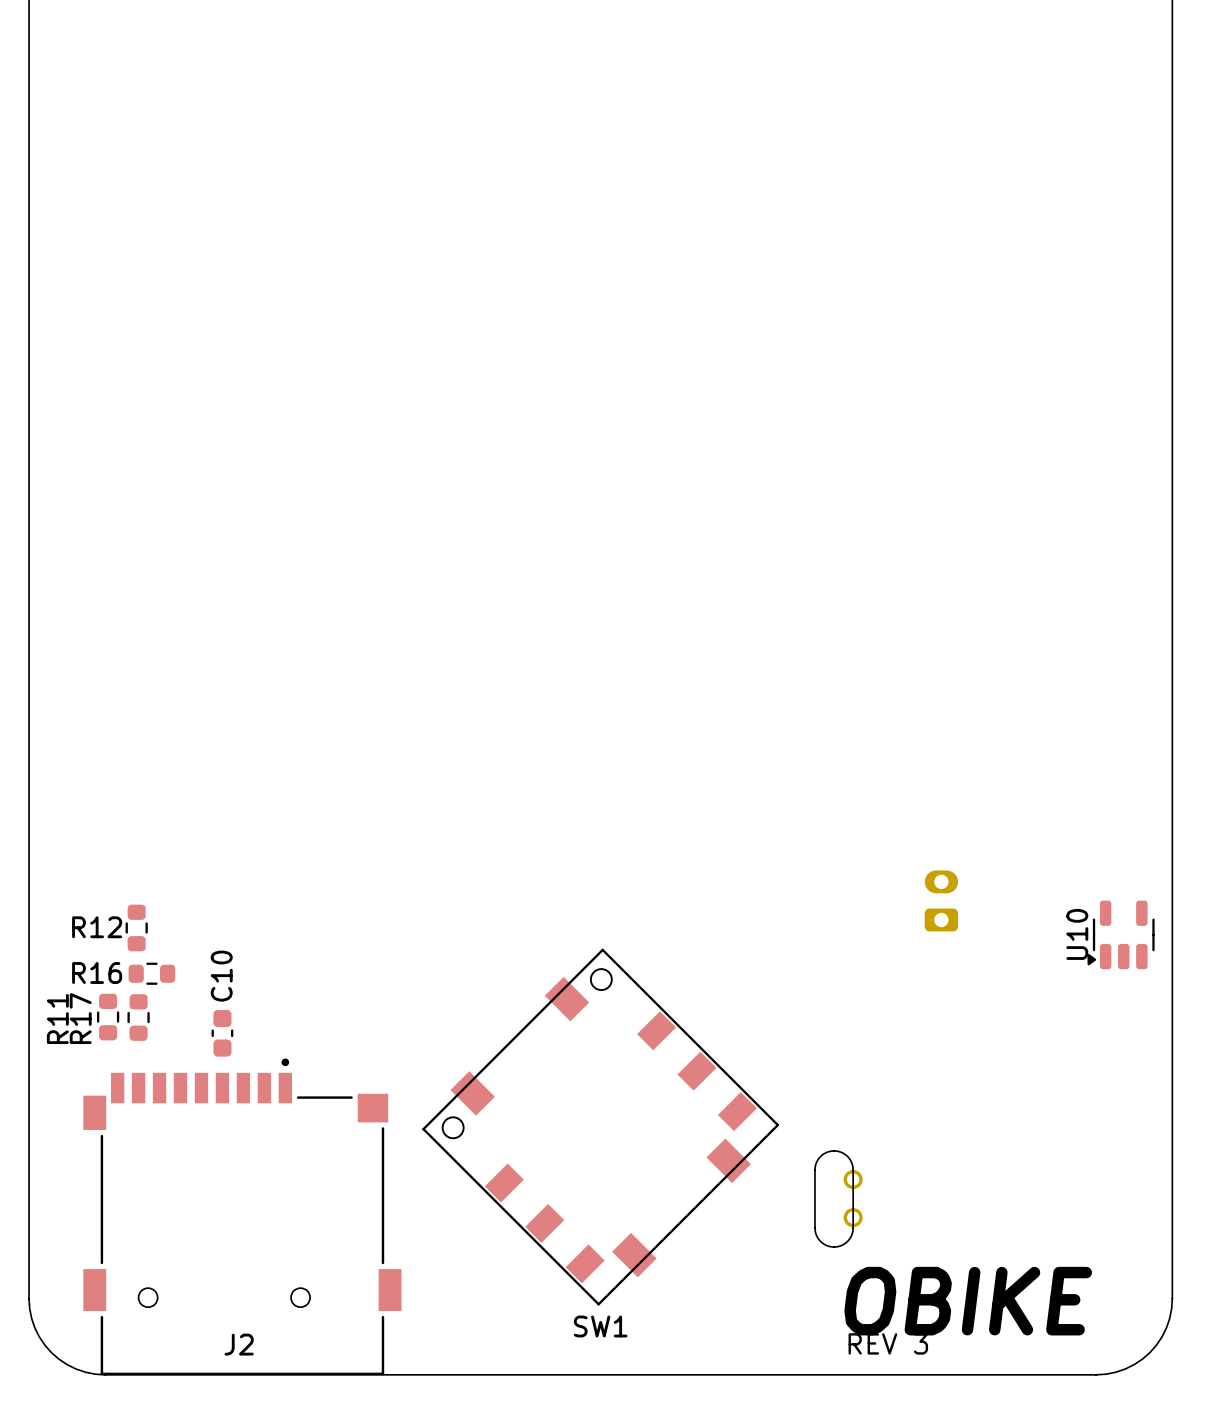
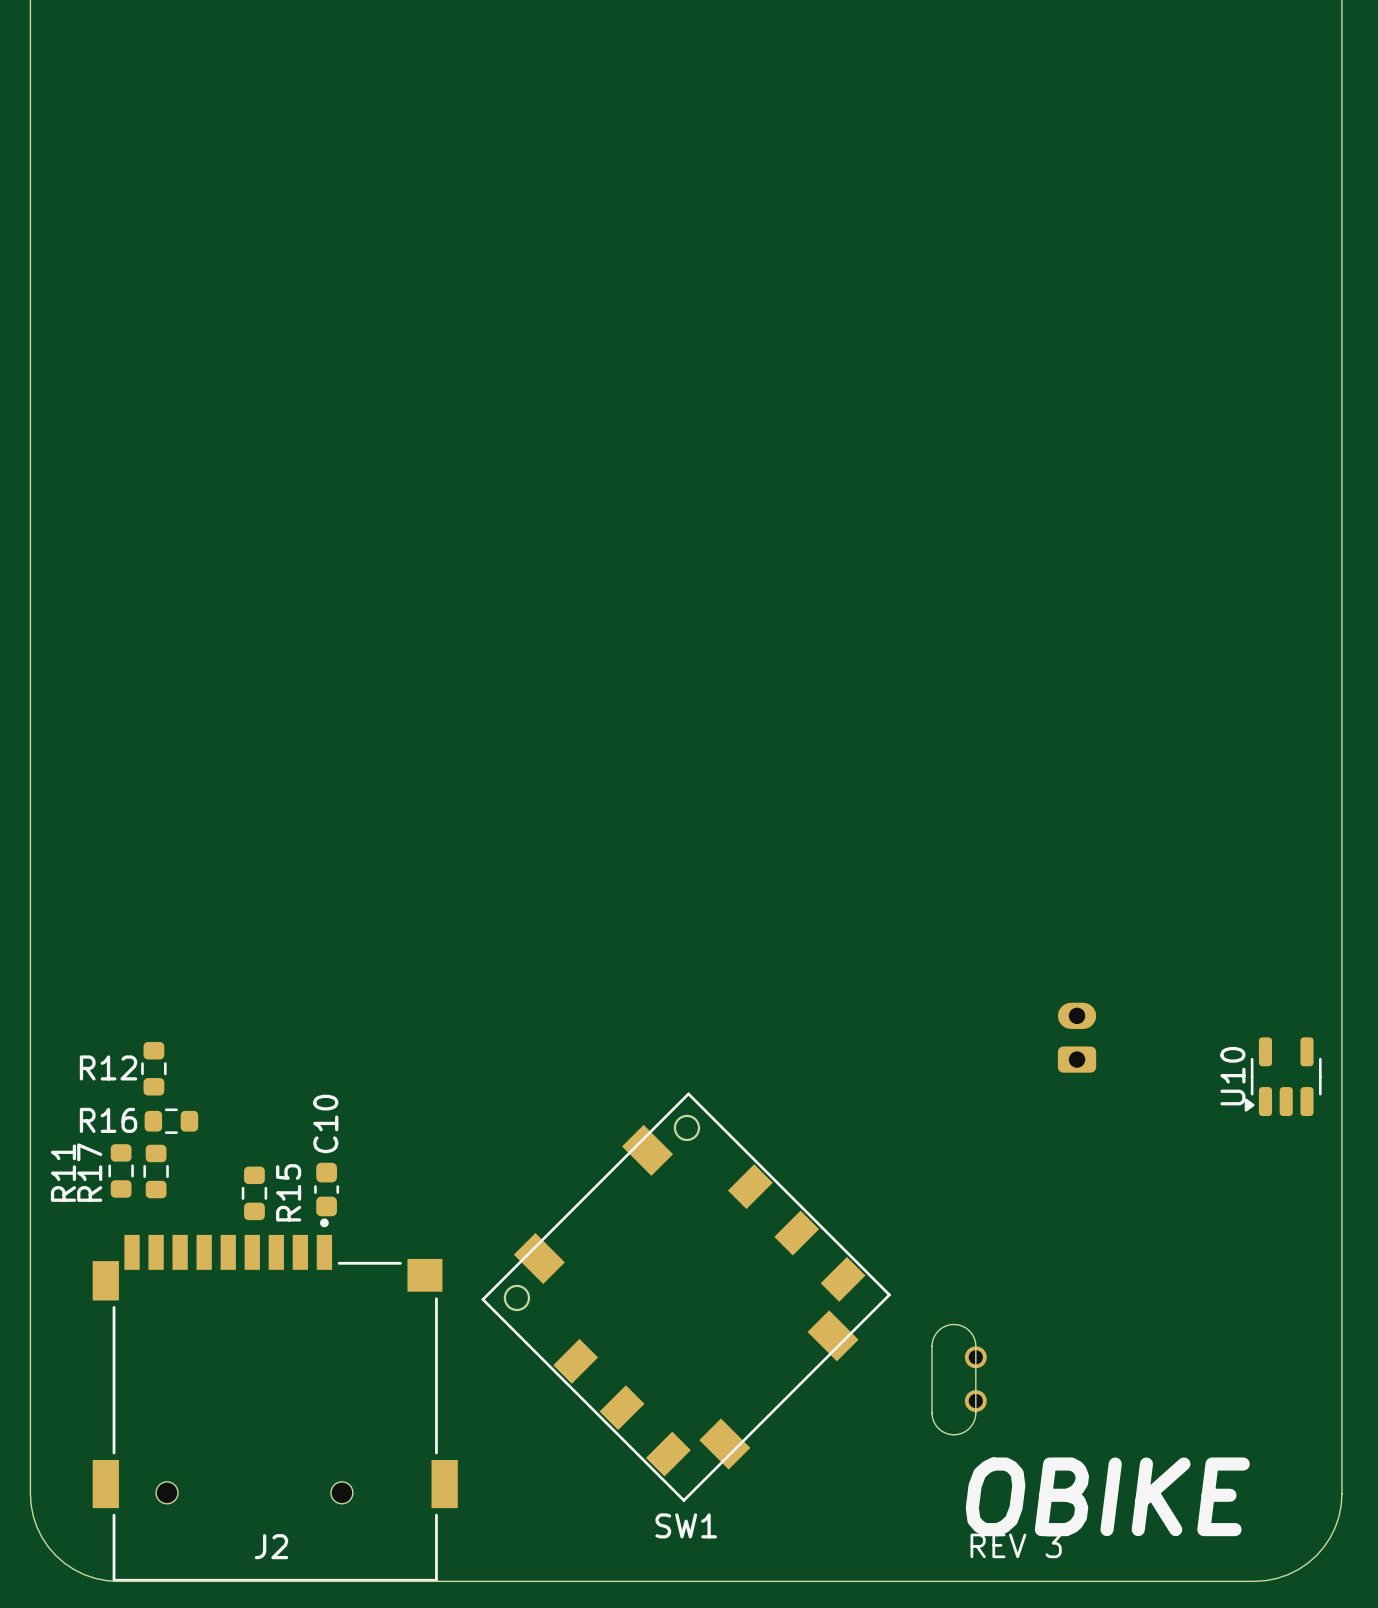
C10 position: (222, 1033) -> (326, 1189)
R15: none -> (254, 1193)

